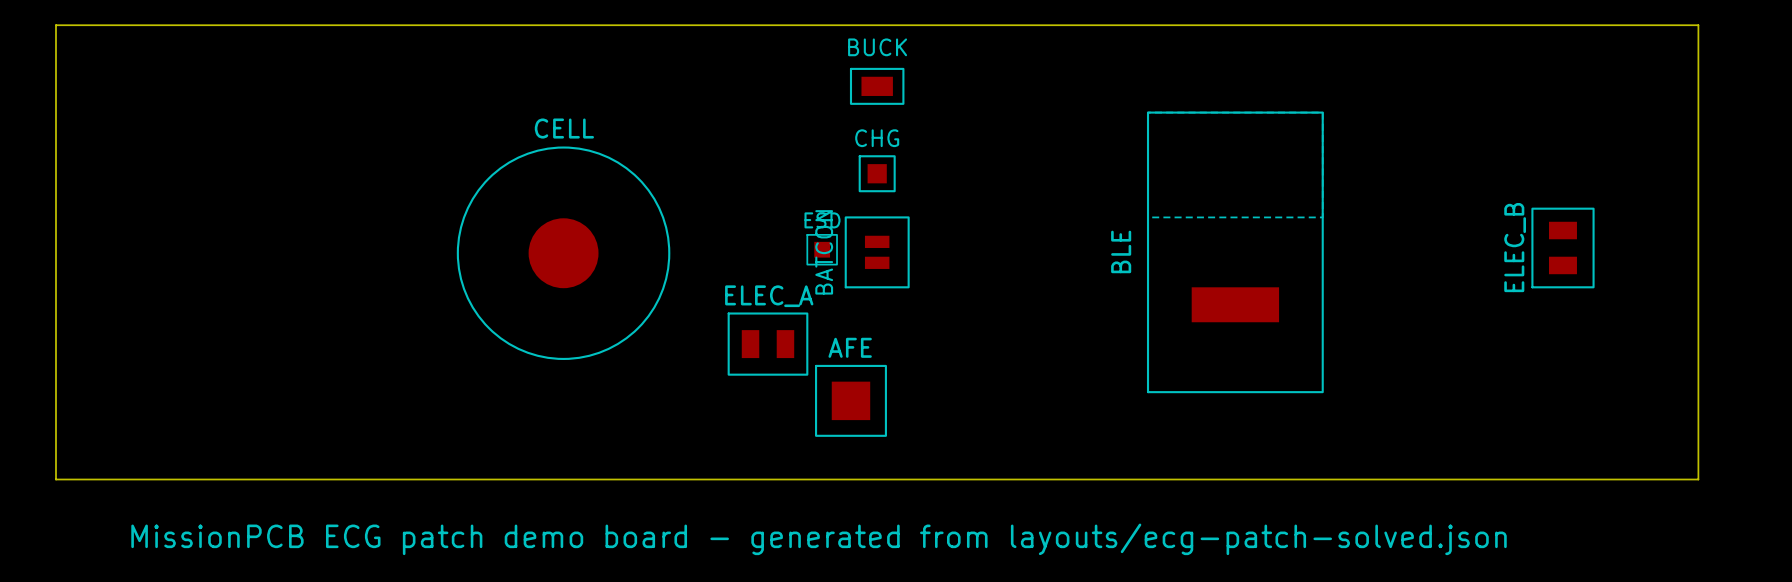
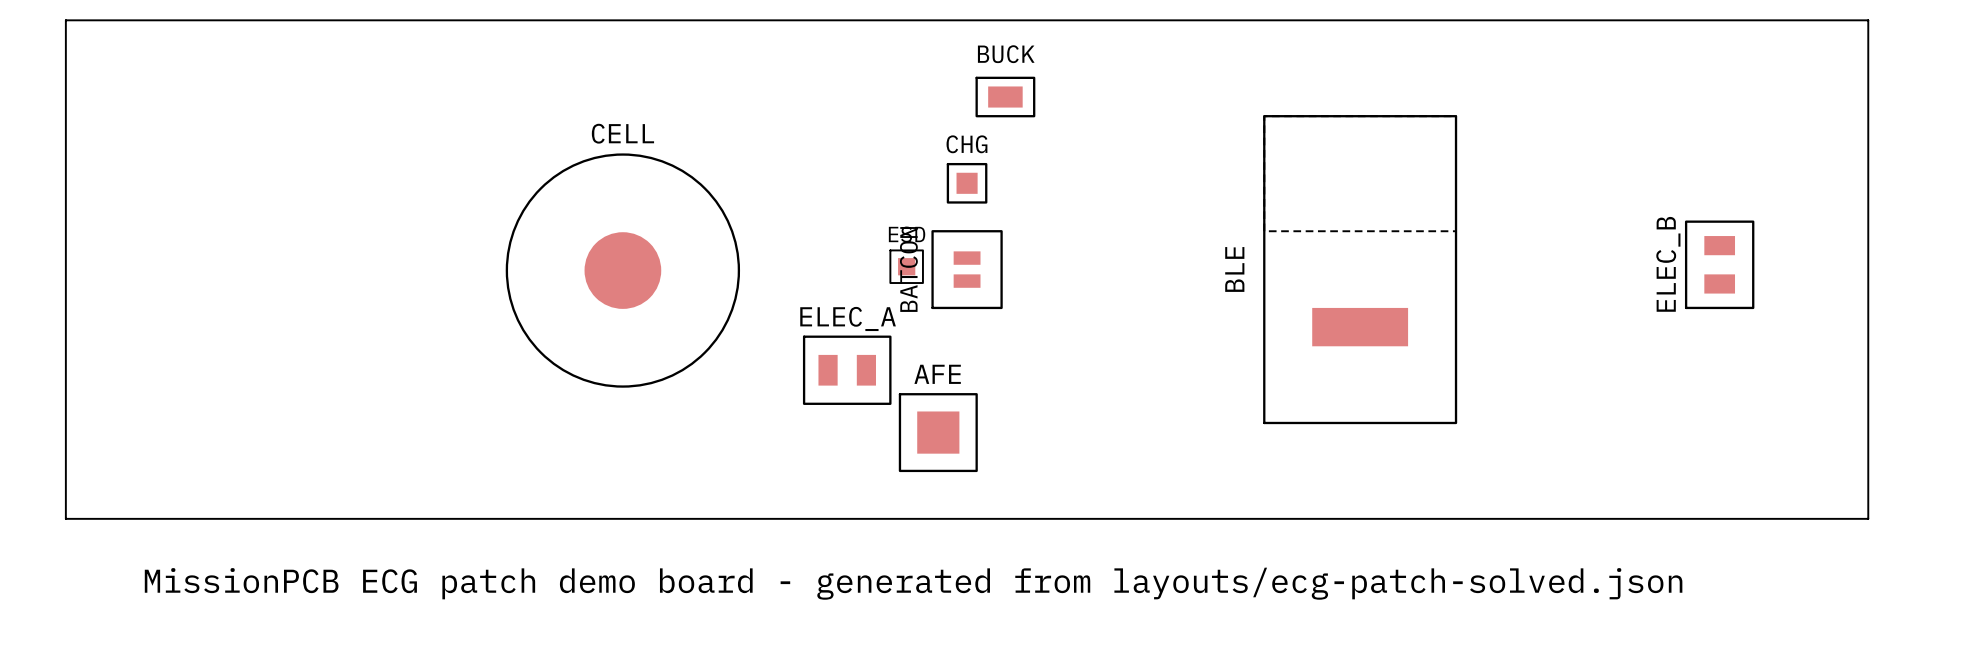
BUCK position: (877, 86) -> (1005, 97)

